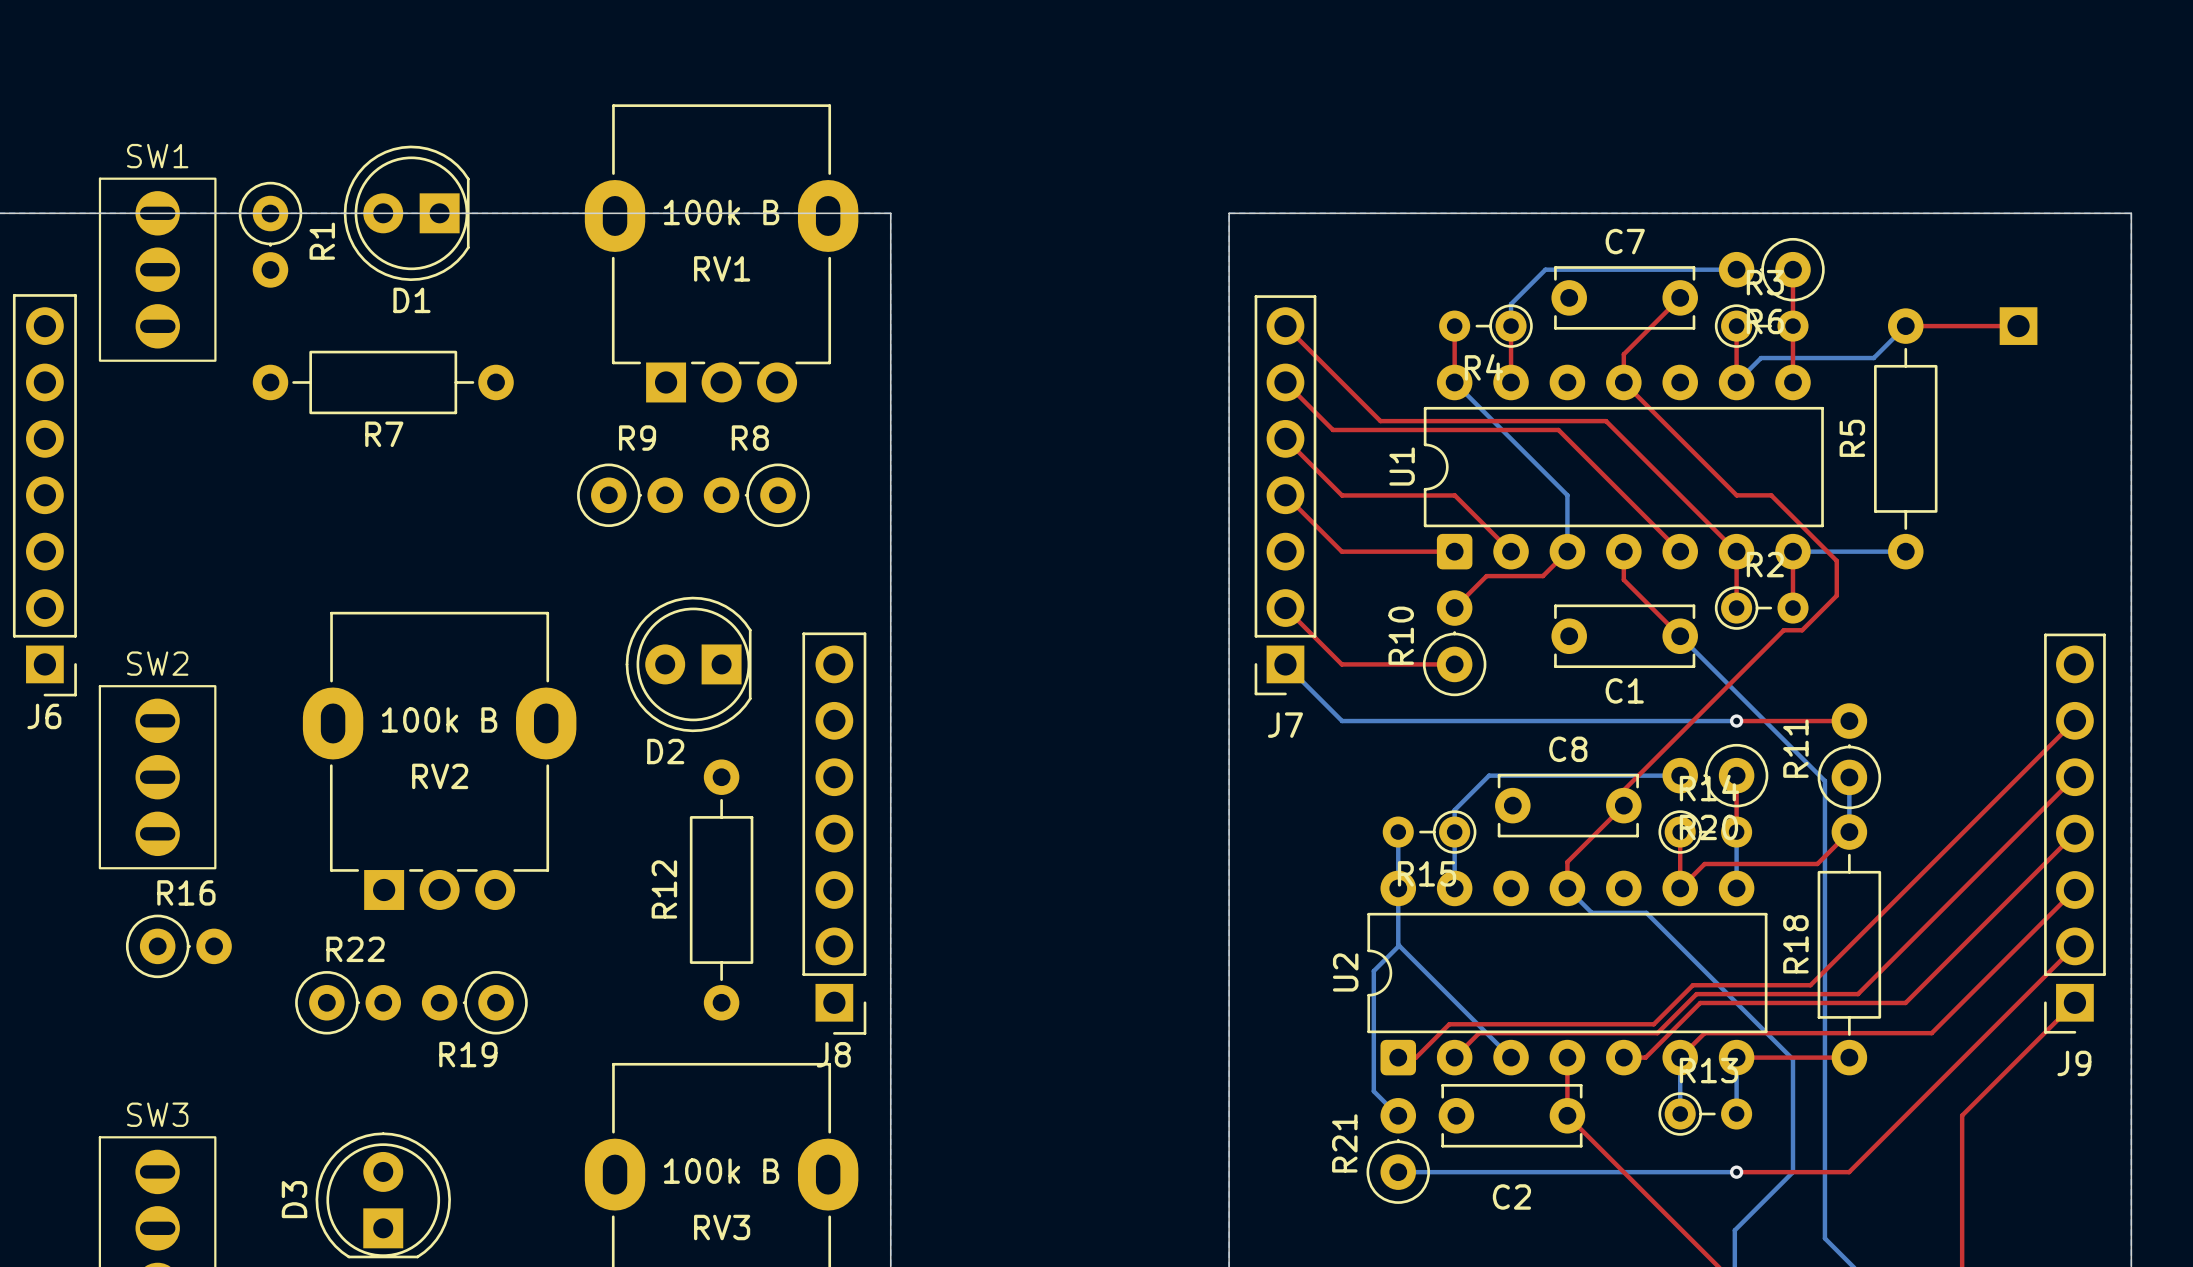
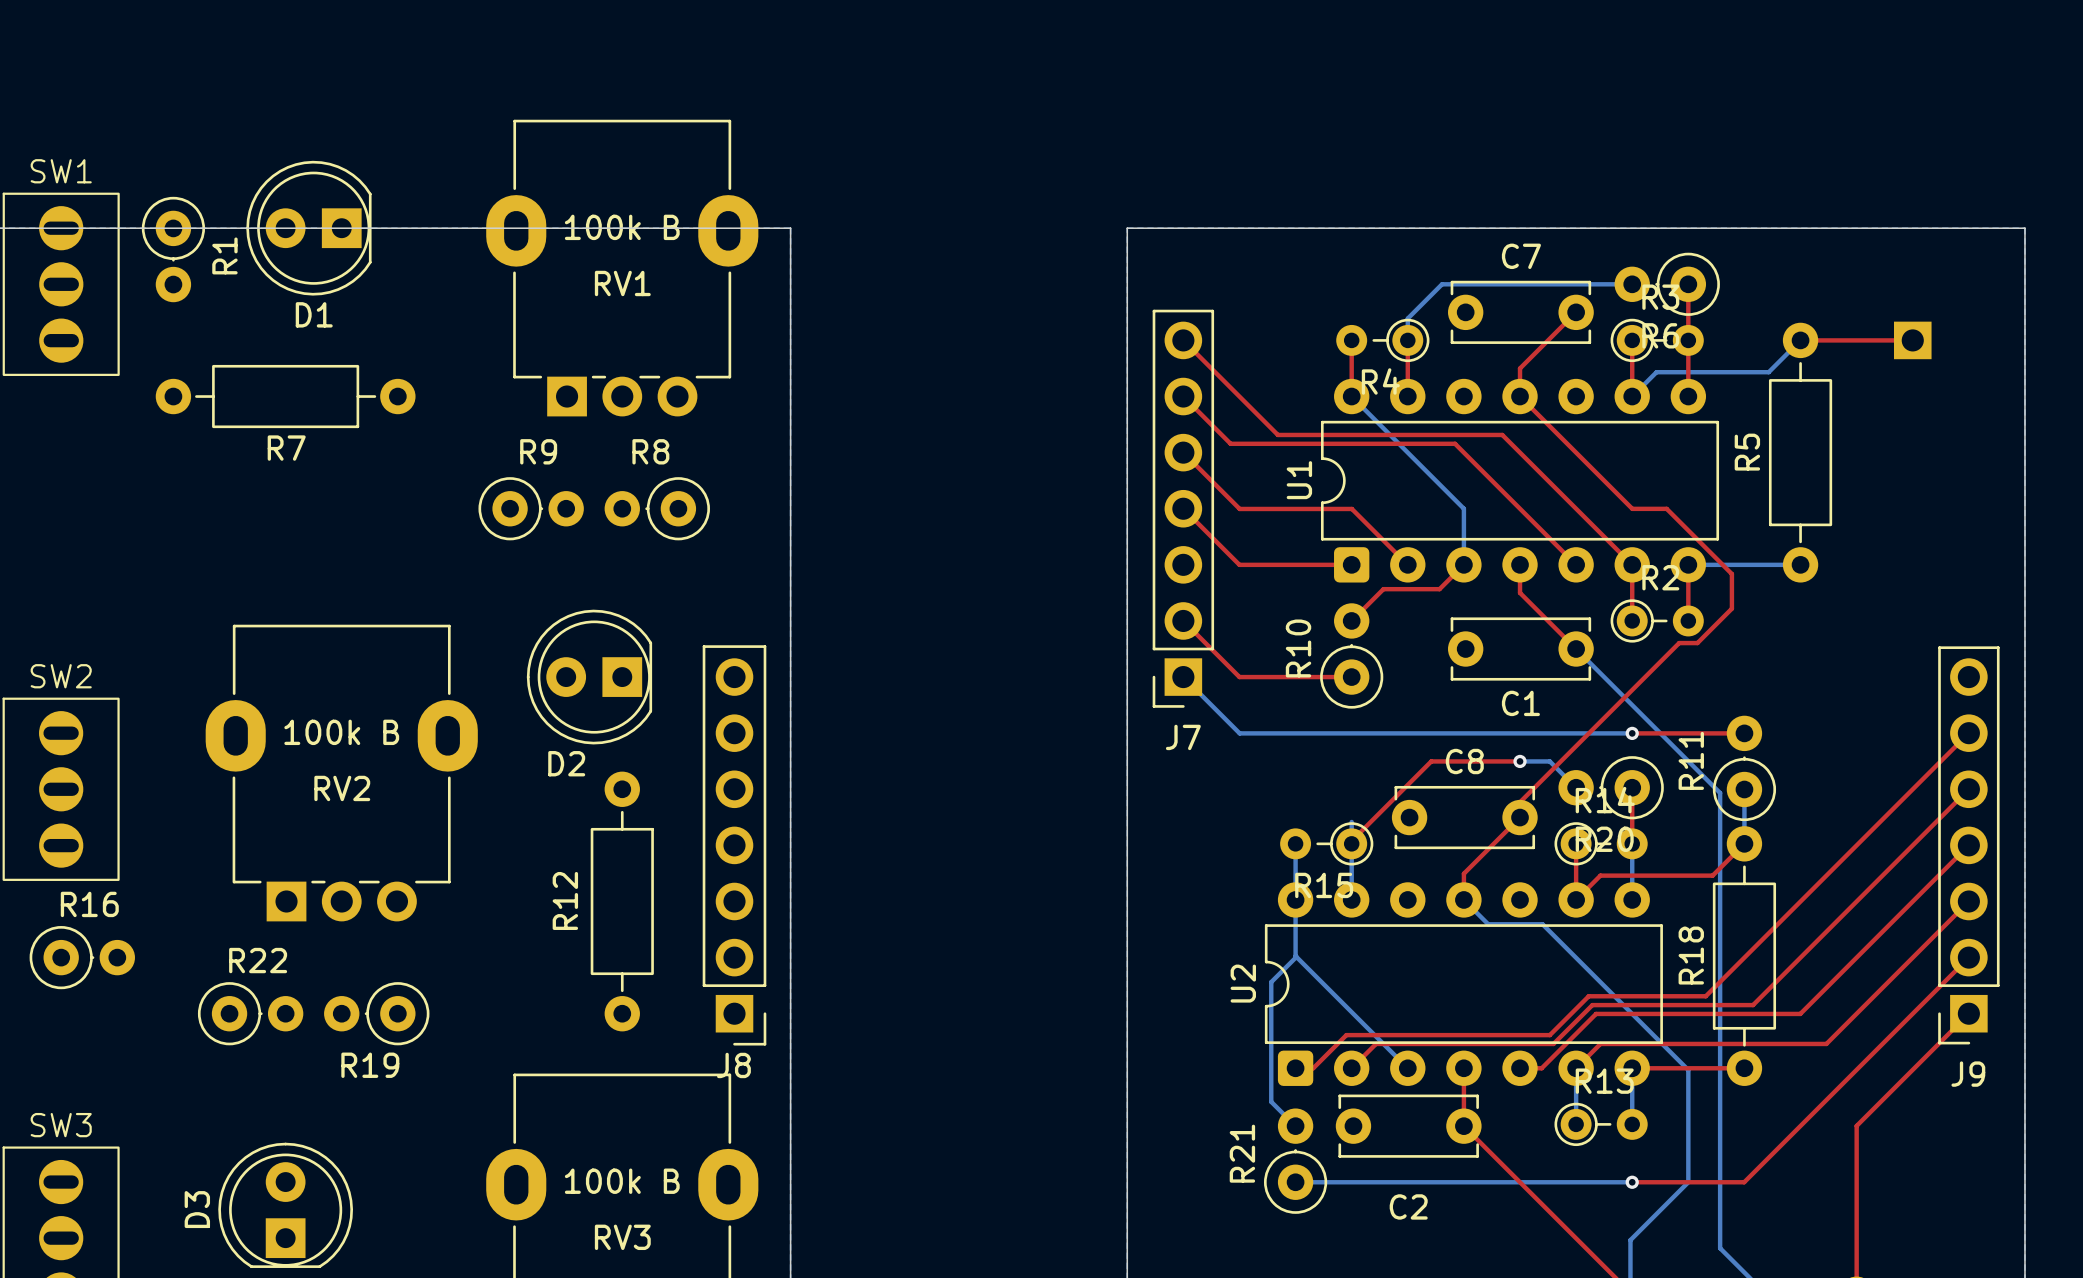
top track: none -> (1520, 761) (1431, 761) (1351, 841) (1351, 843)
via: none -> (1520, 761)
bottom track: (1680, 775) (1489, 775) (1454, 810) -> (1576, 787) (1549, 761) (1520, 761)

